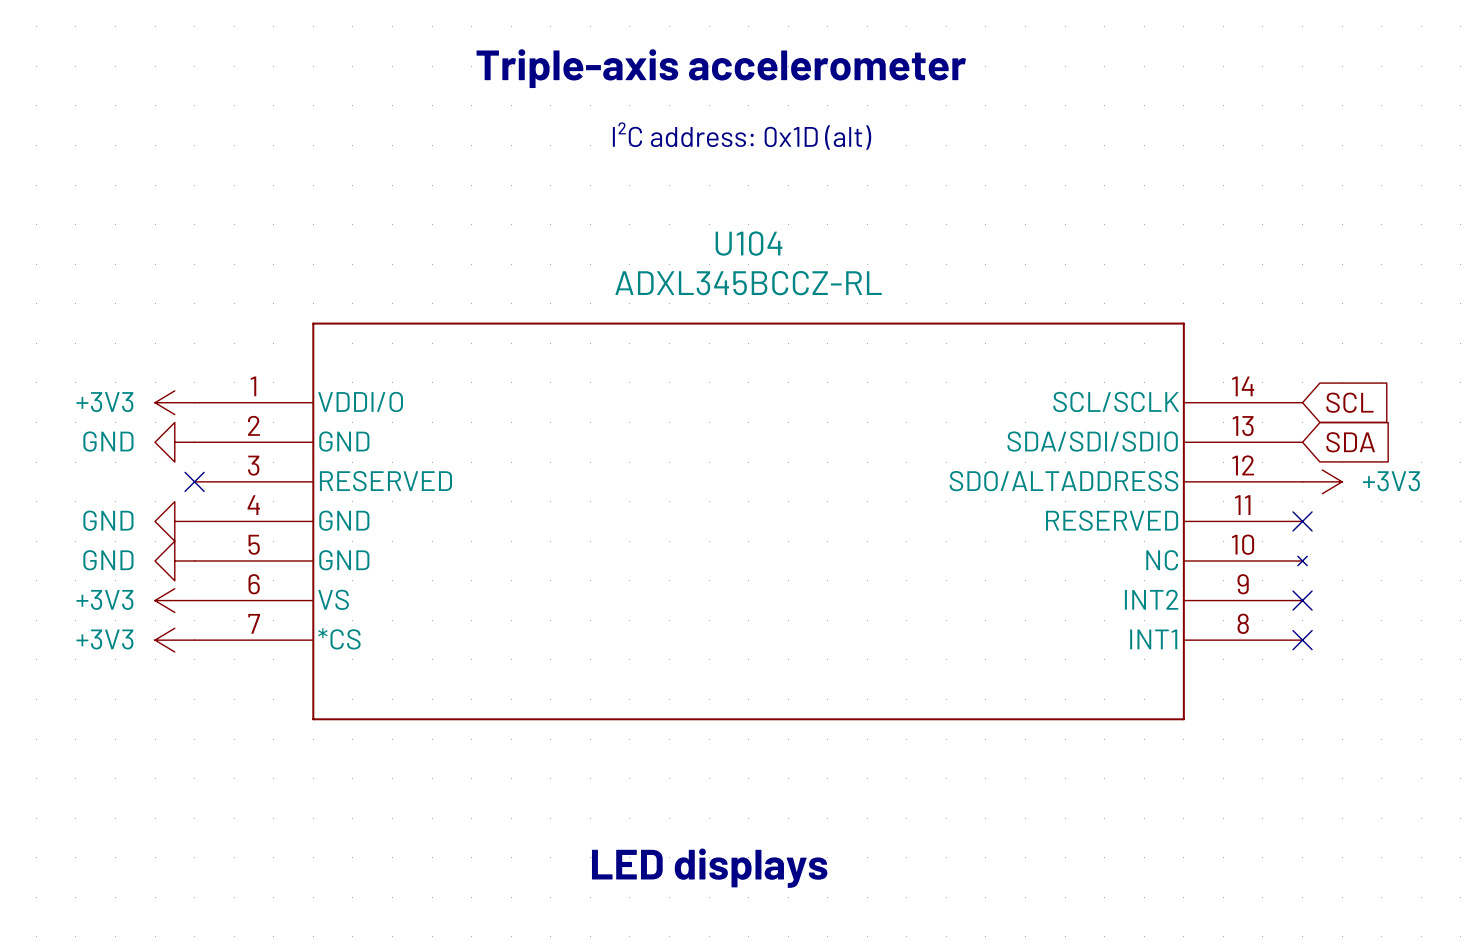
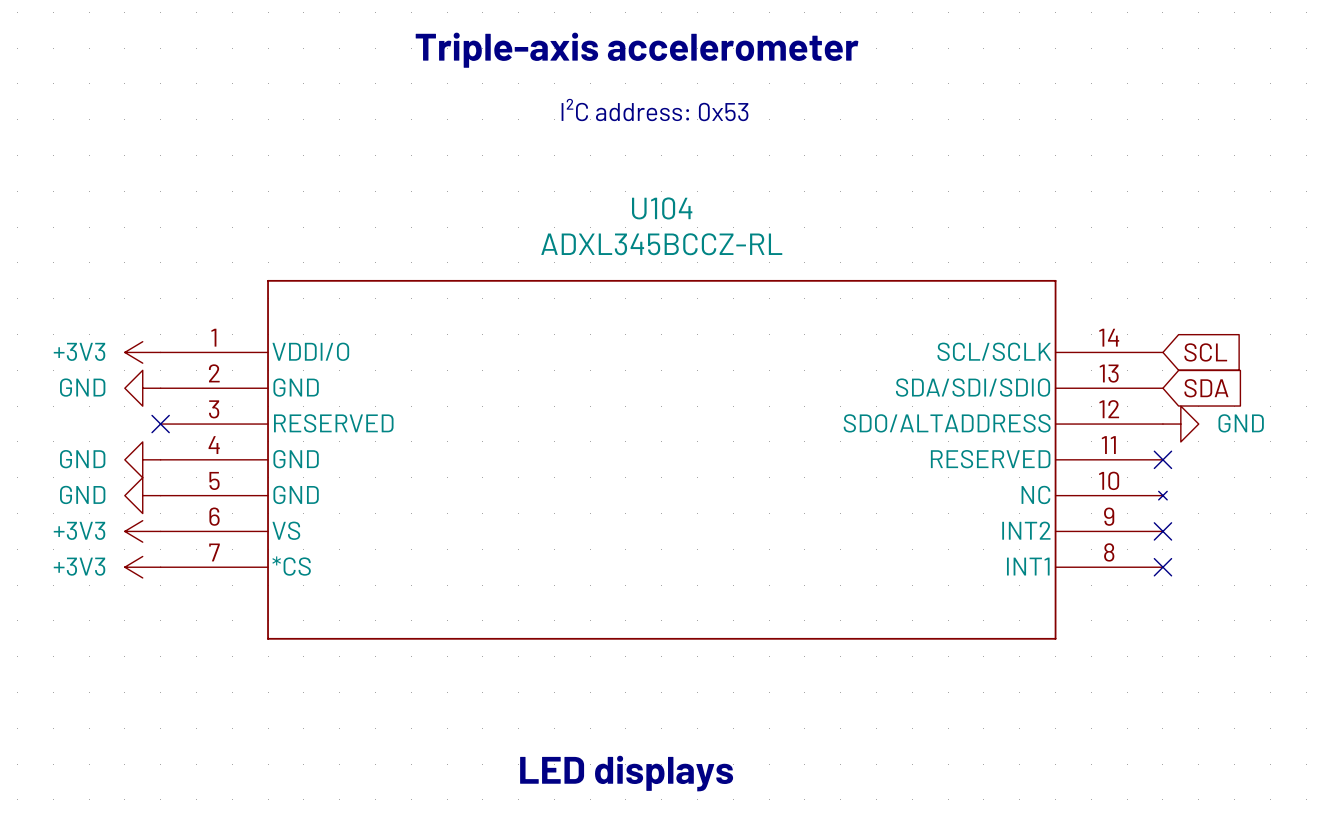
text: I²C address: 0x1D (alt) (742, 136) -> I²C address: 0x53 (655, 110)
power symbol: +3V3 (1322, 481) -> GND (1180, 424)

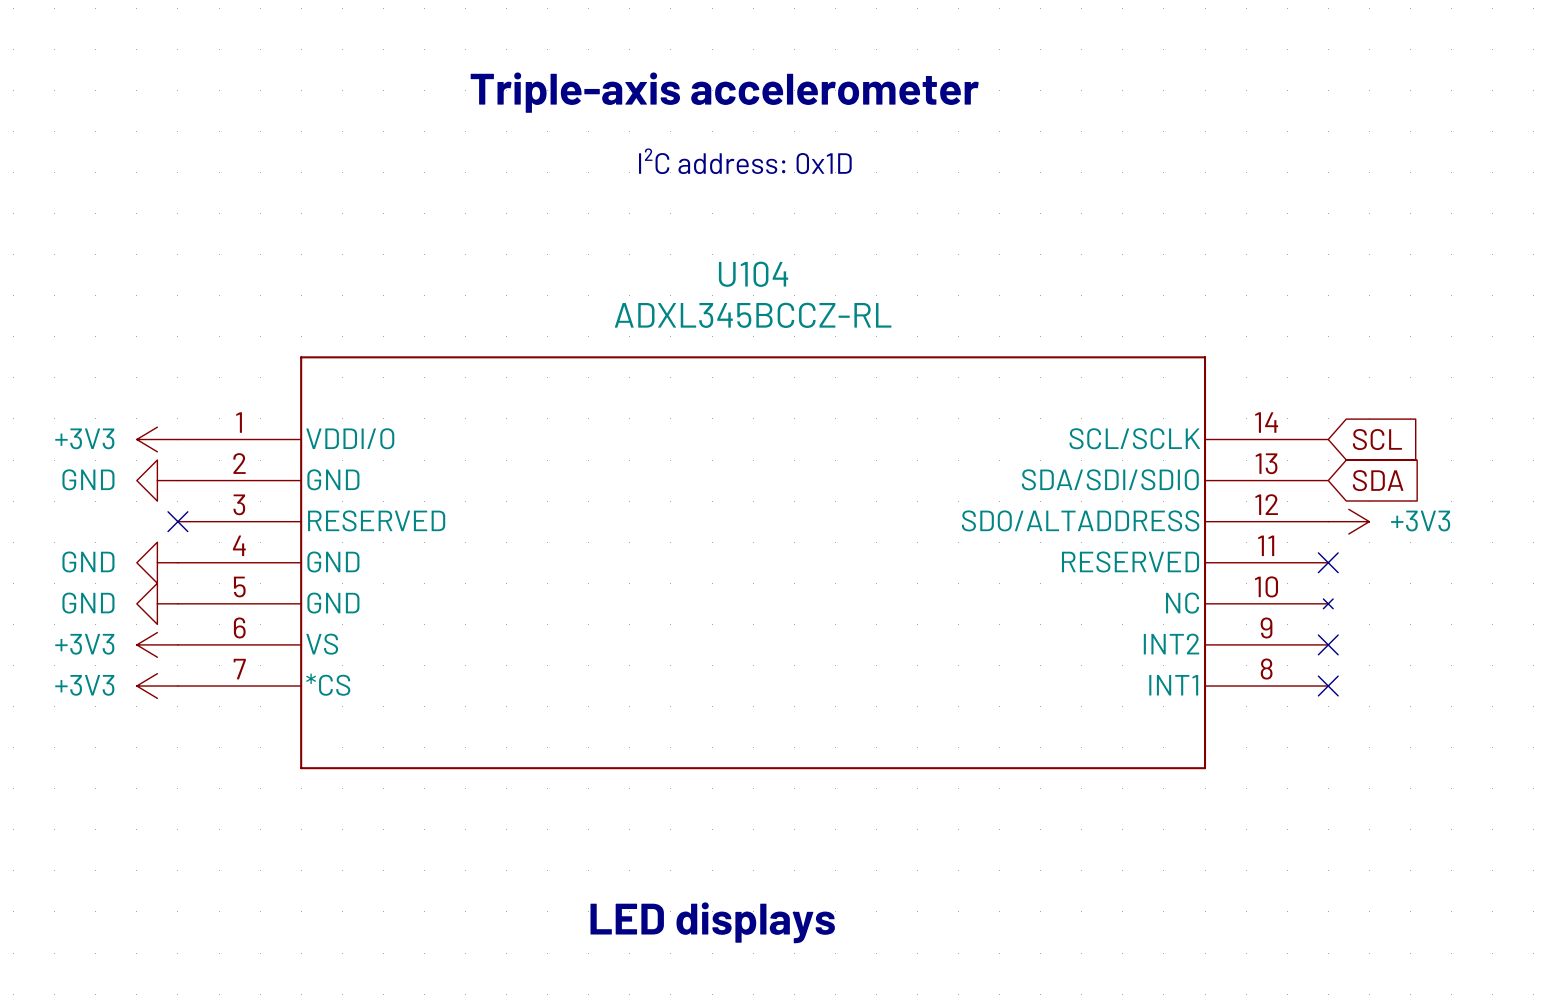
text: I²C address: 0x53 (655, 110) -> I²C address: 0x1D (745, 161)
power symbol: GND (1180, 424) -> +3V3 (1348, 521)

